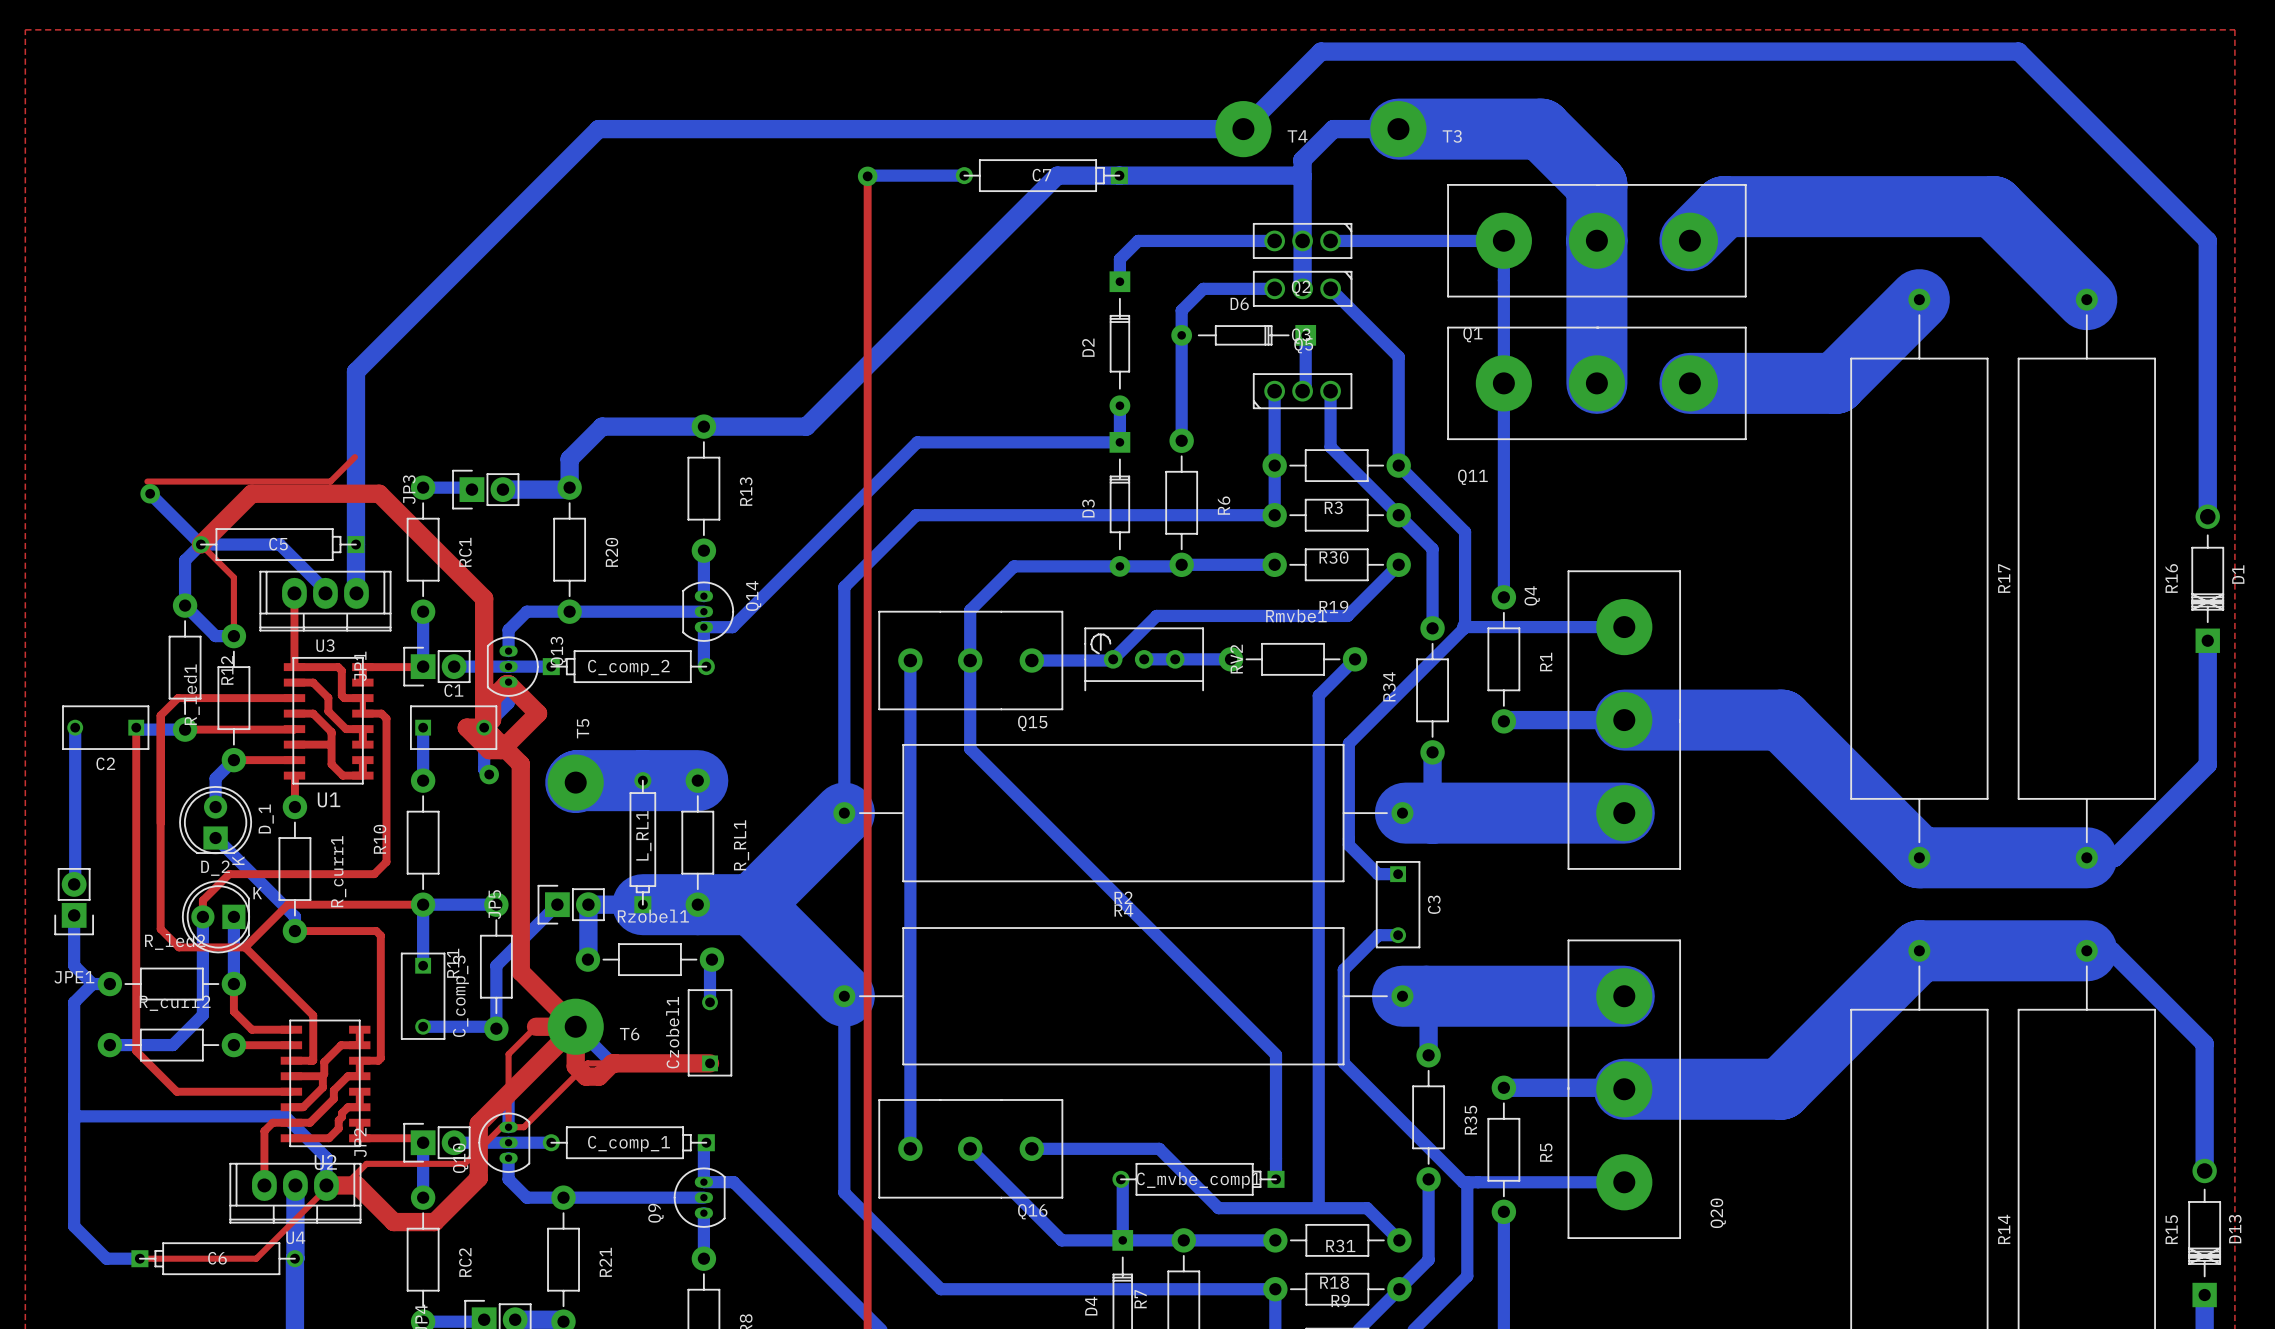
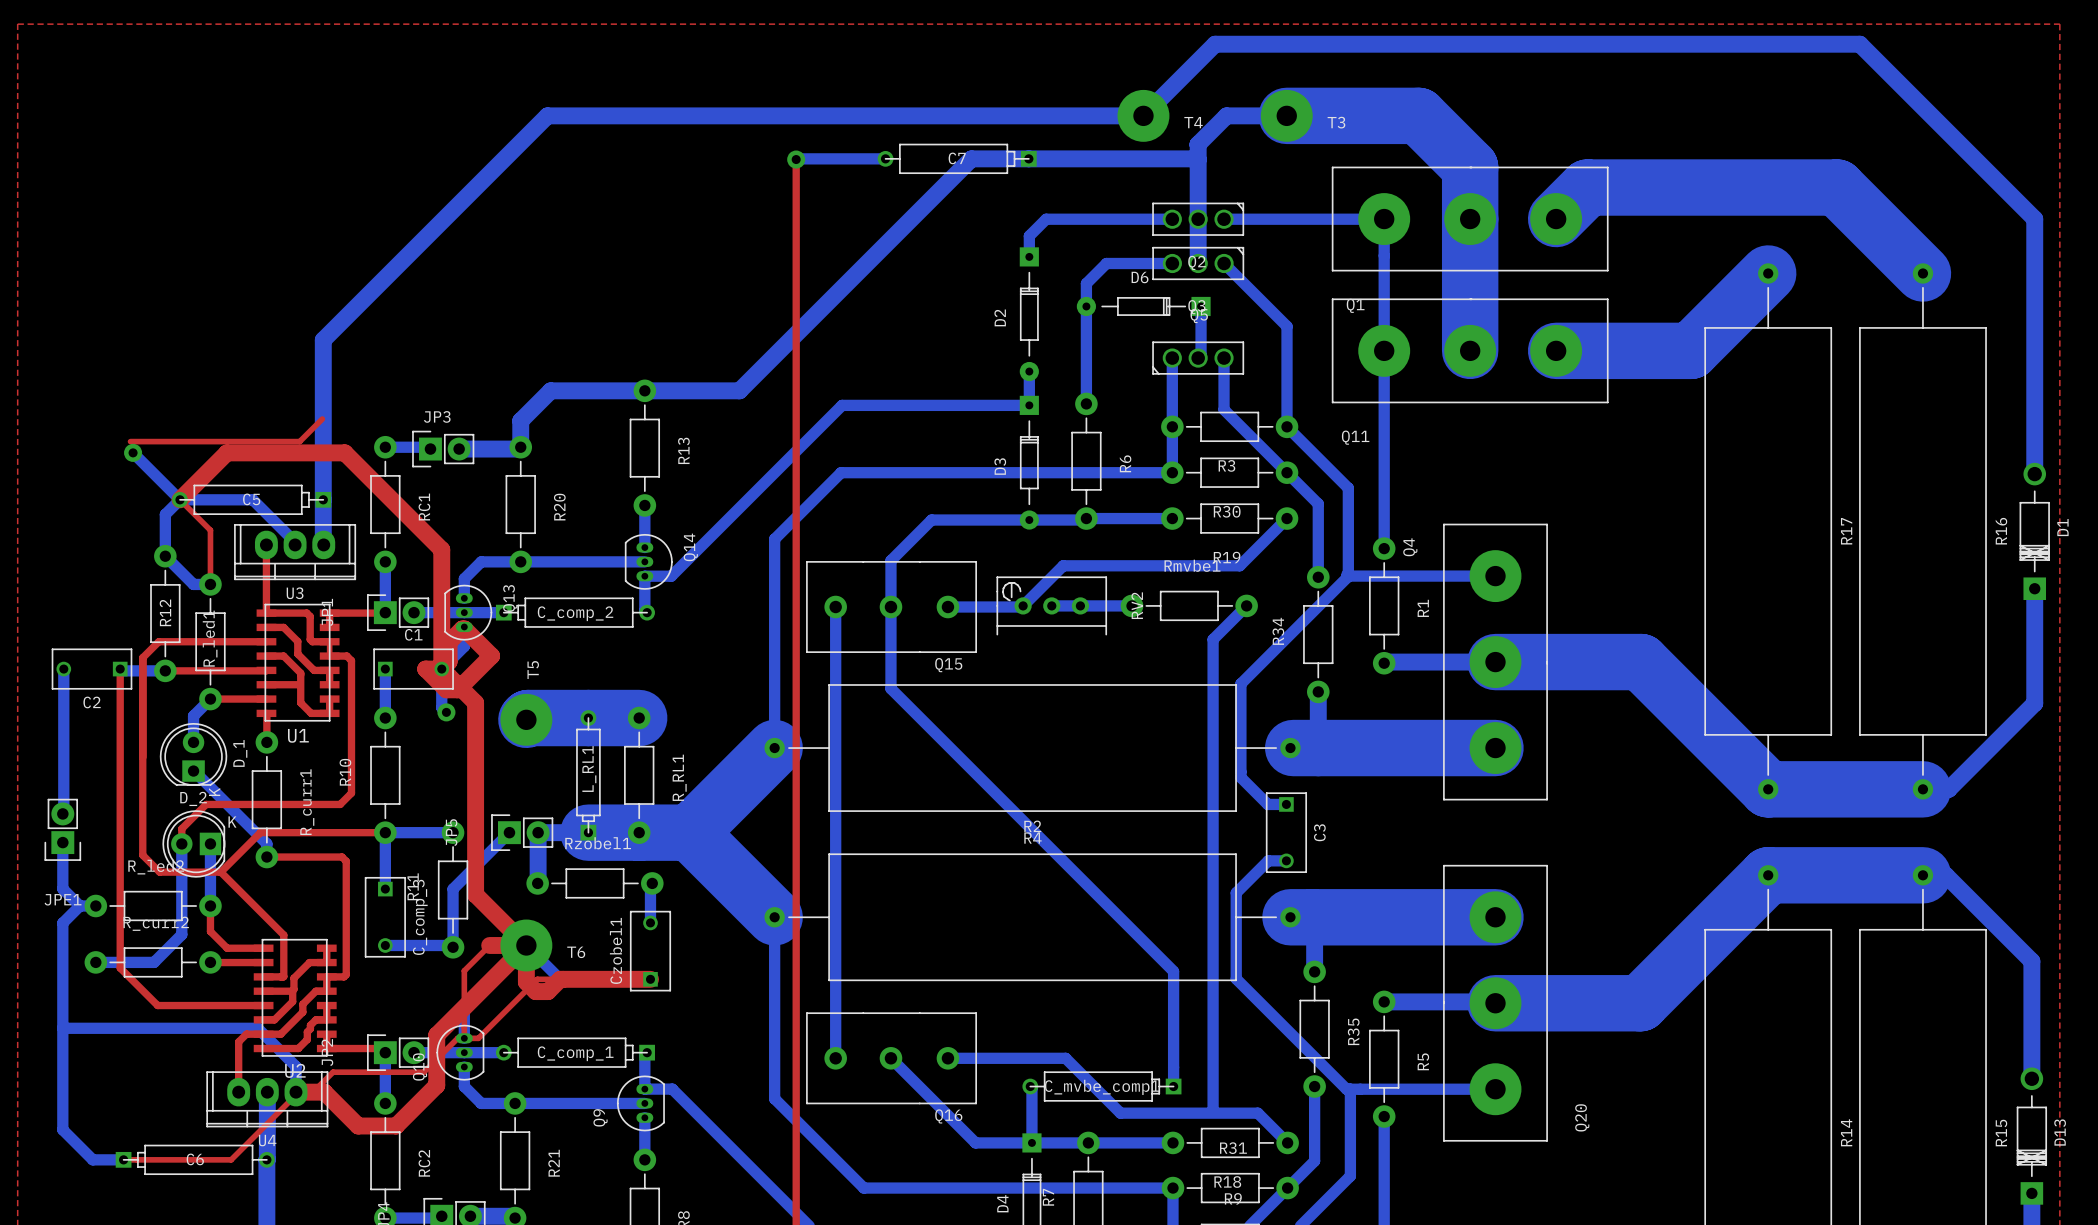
JP3 name rotation: 0° (409, 489) -> 90° clockwise (437, 416)
JP3 name position: JP3 (409, 489) -> JP3 (437, 416)
R12 name position: R12 (227, 670) -> R12 (165, 612)
R_led1 name position: R_led1 (191, 694) -> R_led1 (210, 638)

